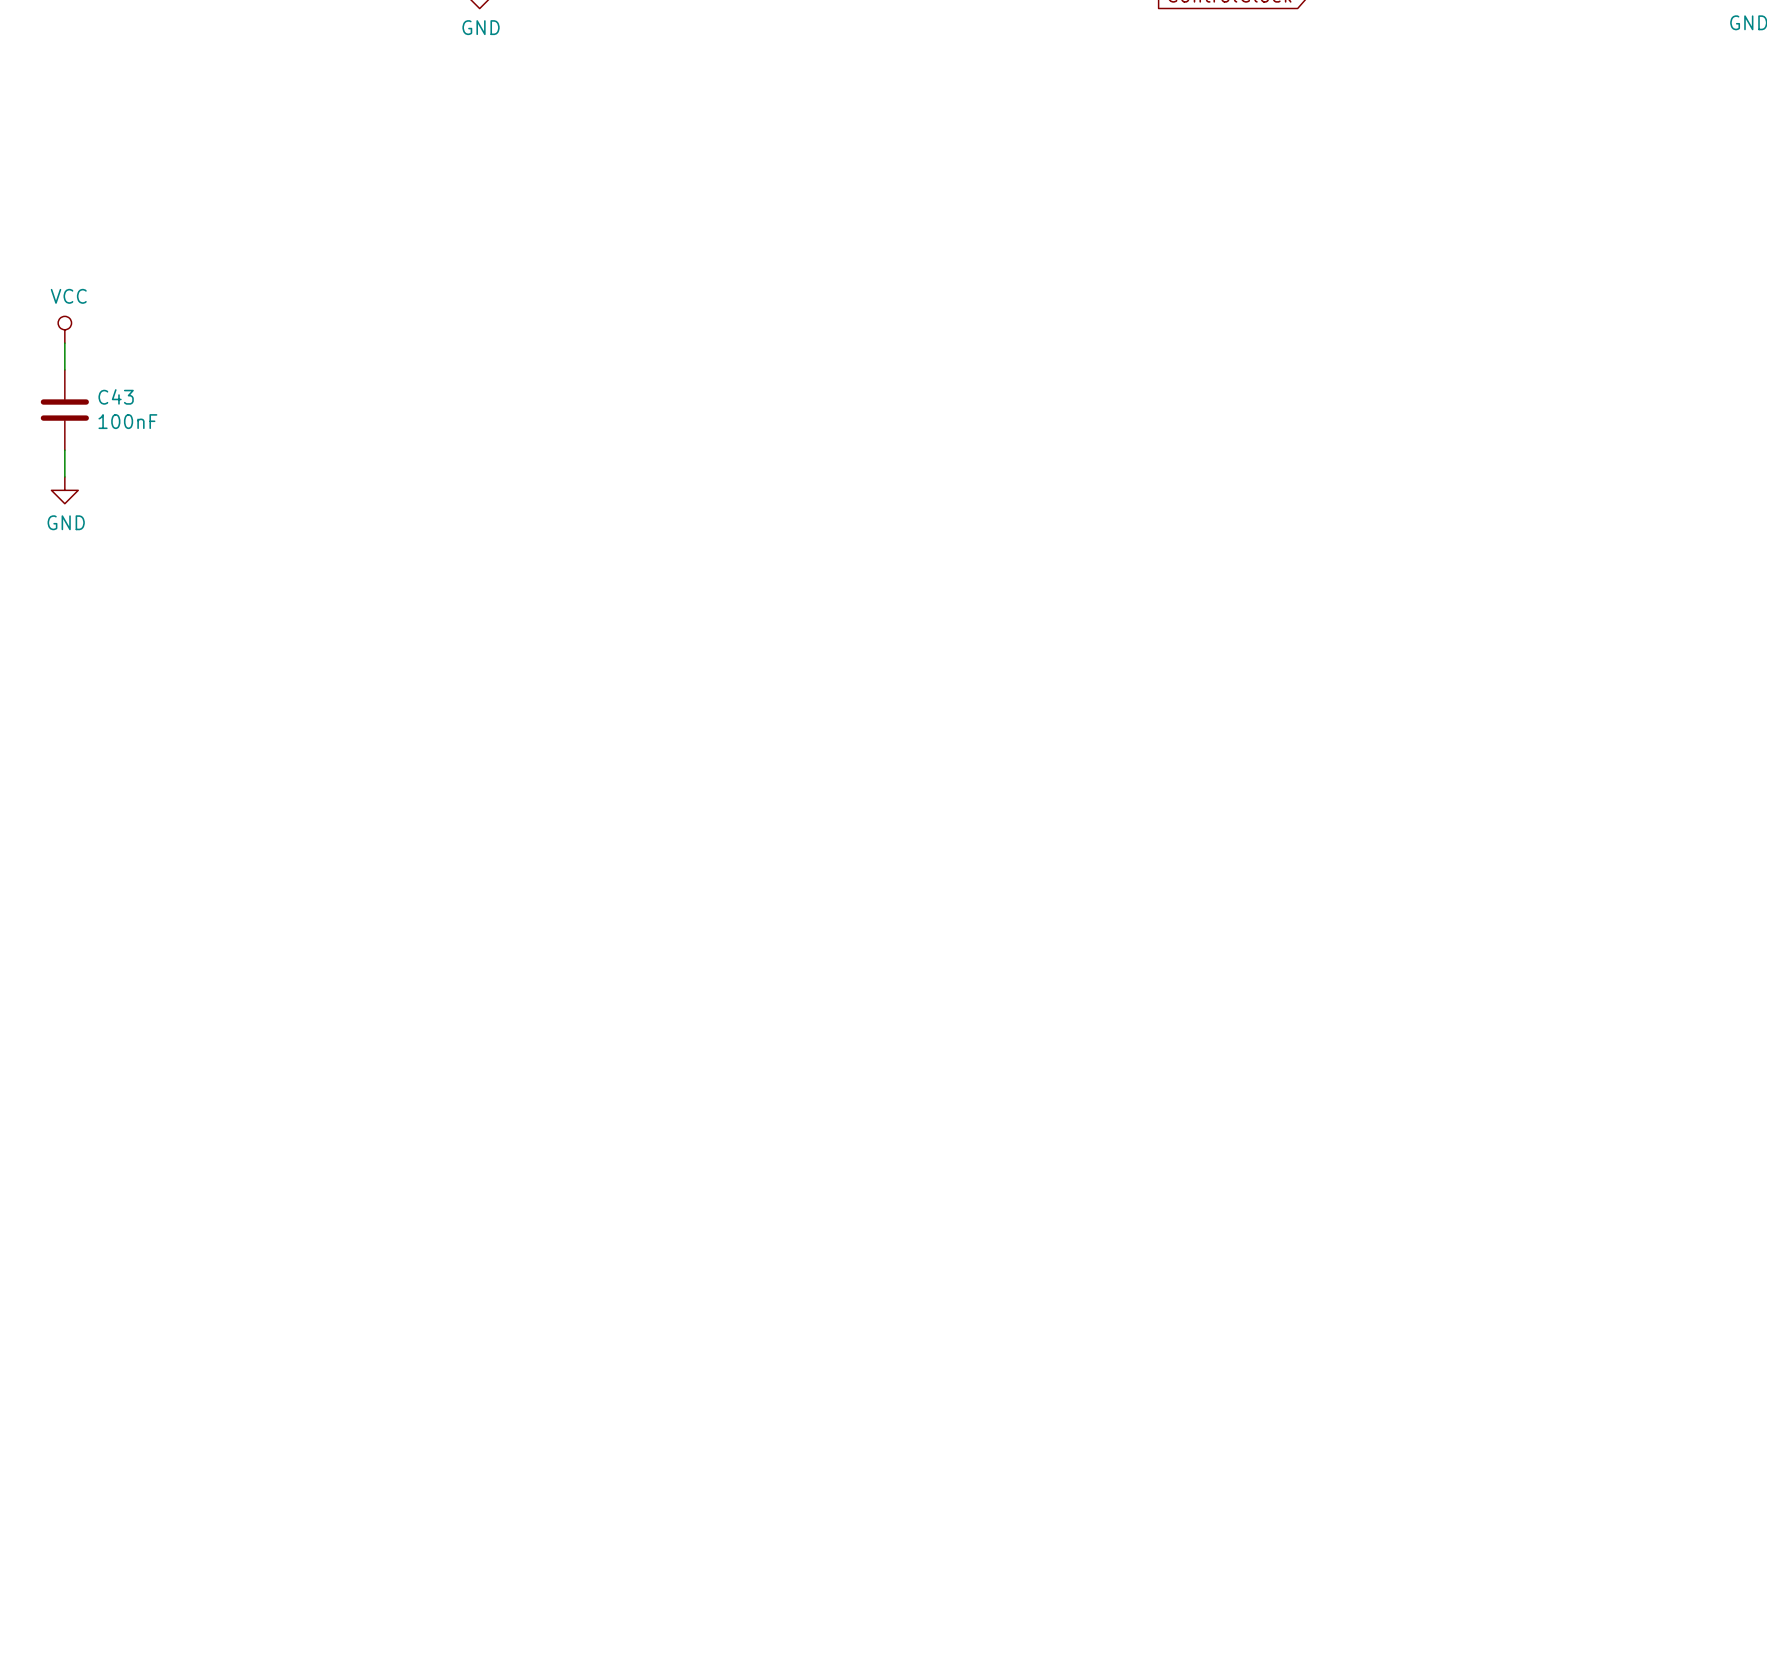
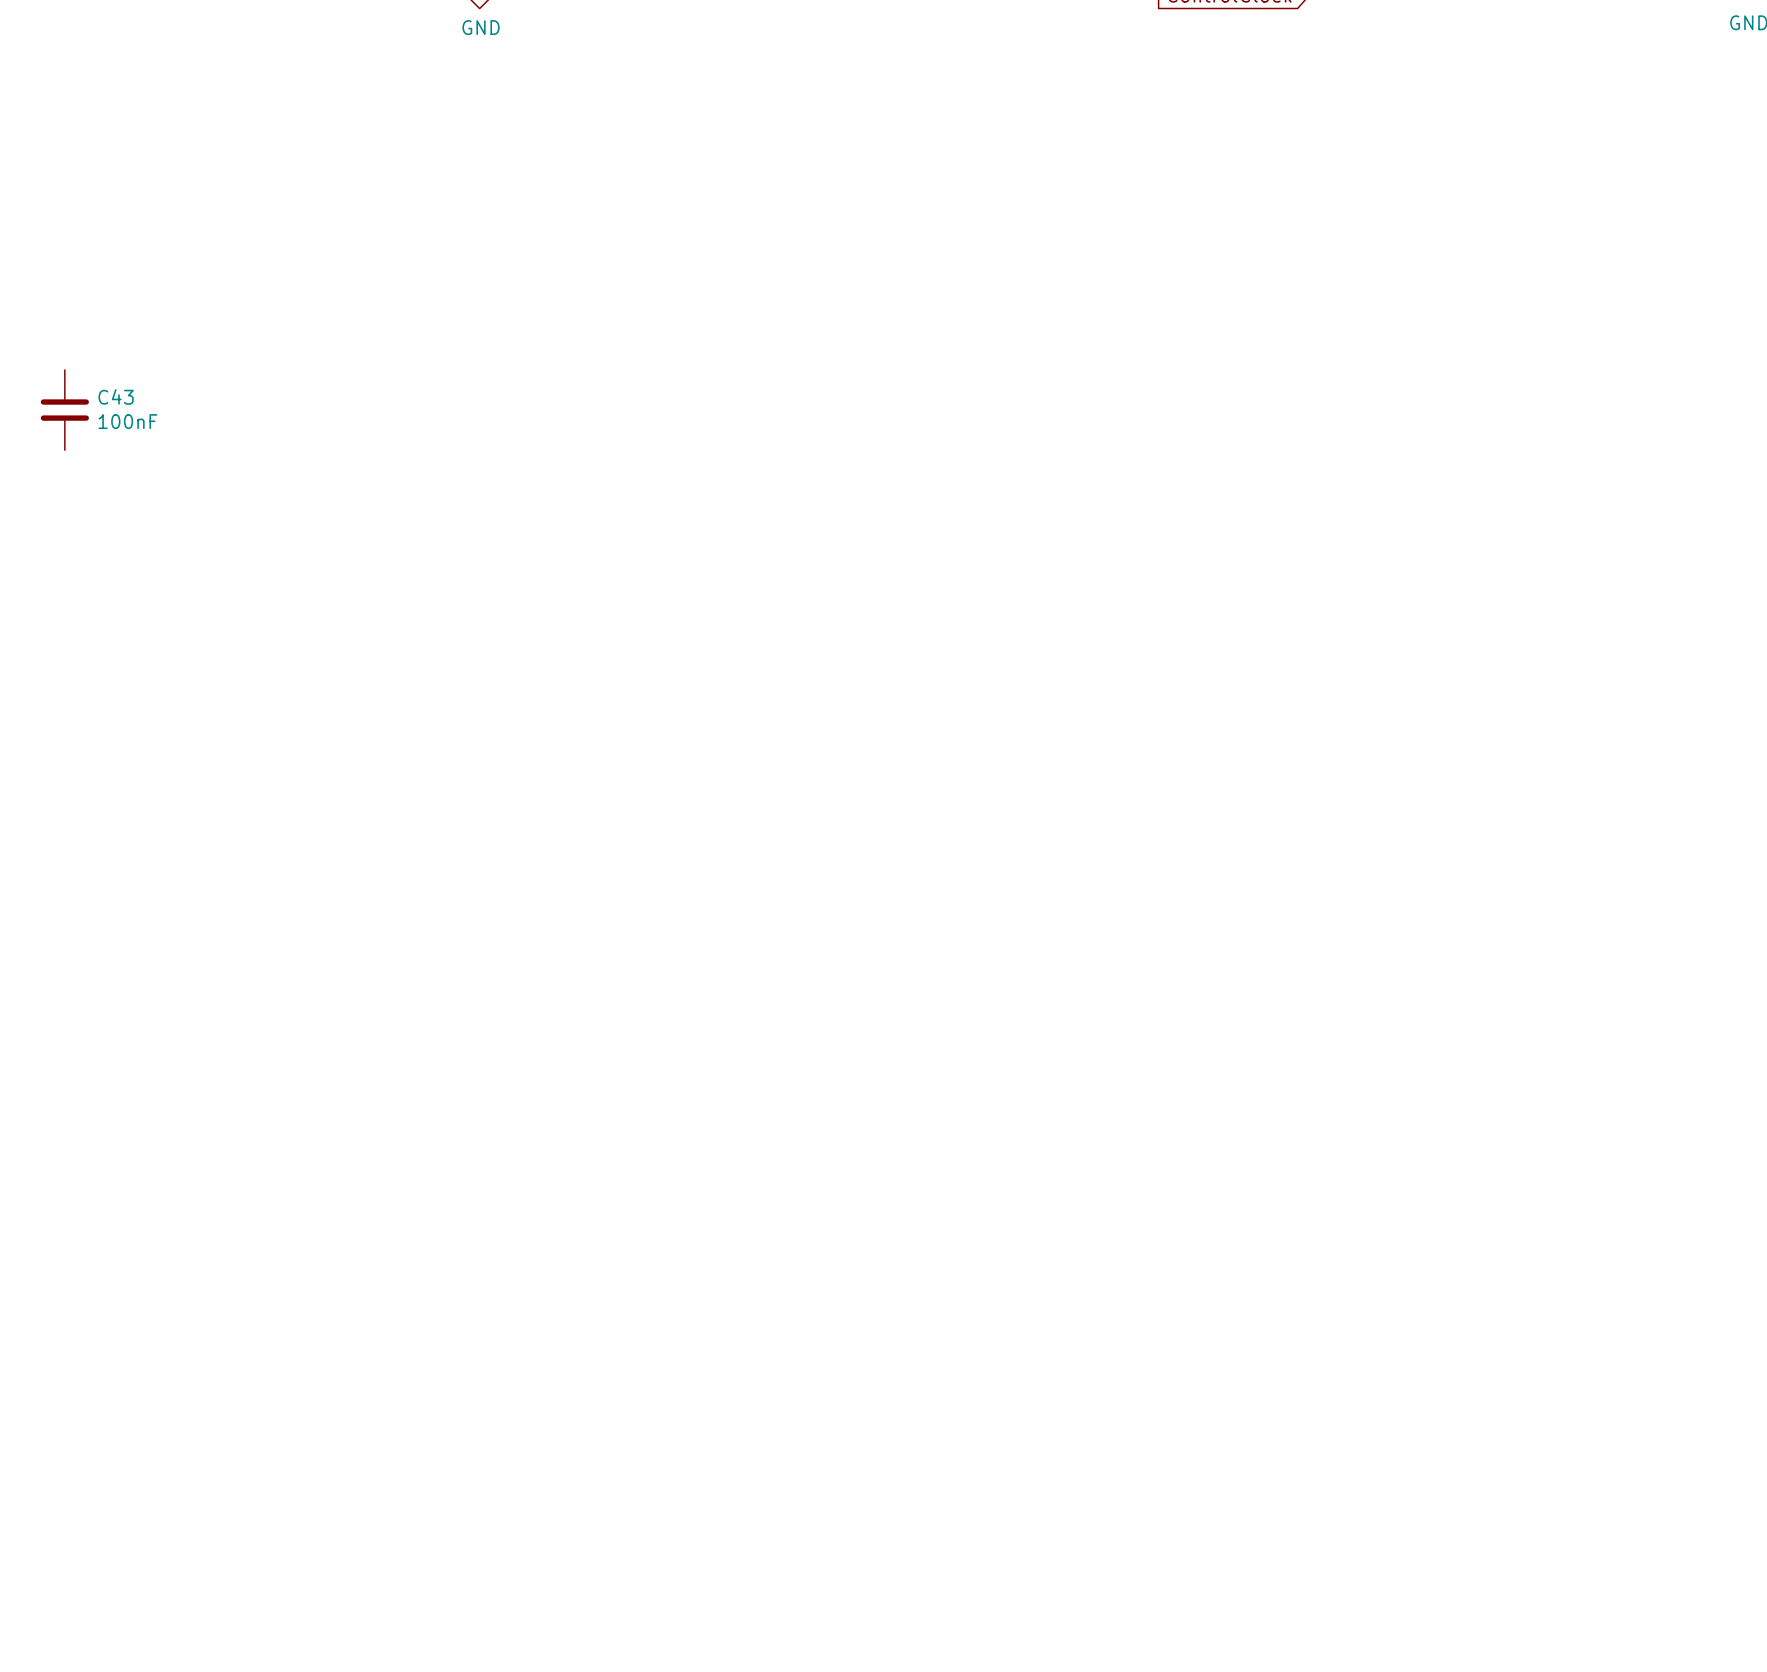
power symbol: VCC (64, 329) -> none
wire: (64, 343) (64, 369) -> none
wire: (64, 450) (64, 476) -> none
power symbol: GND (64, 490) -> none

